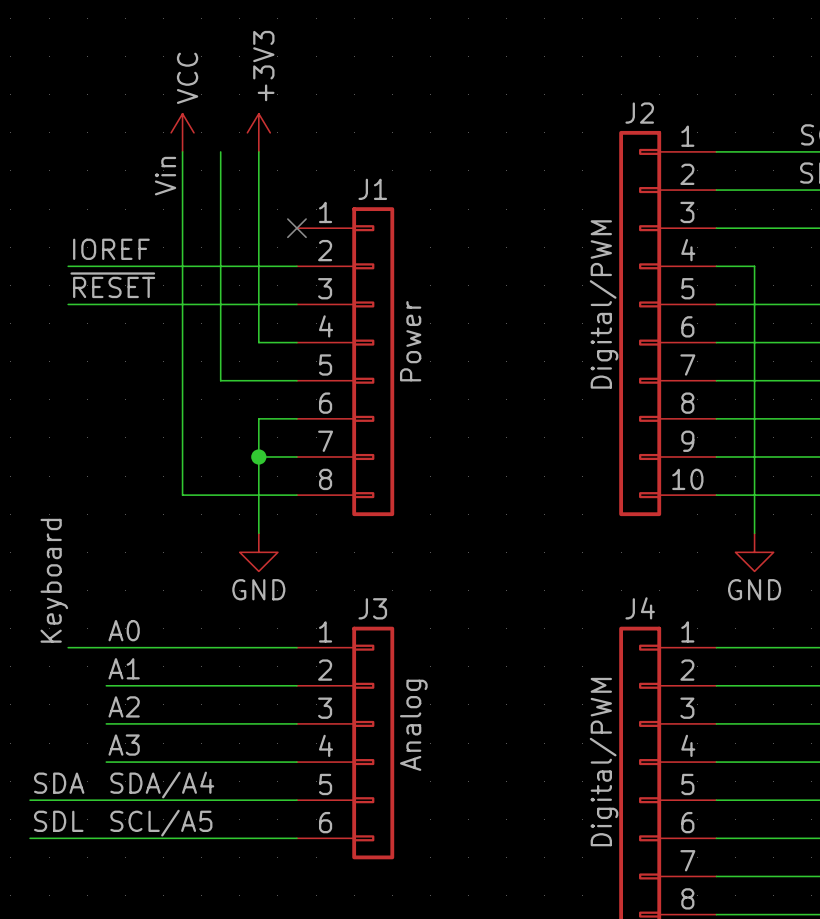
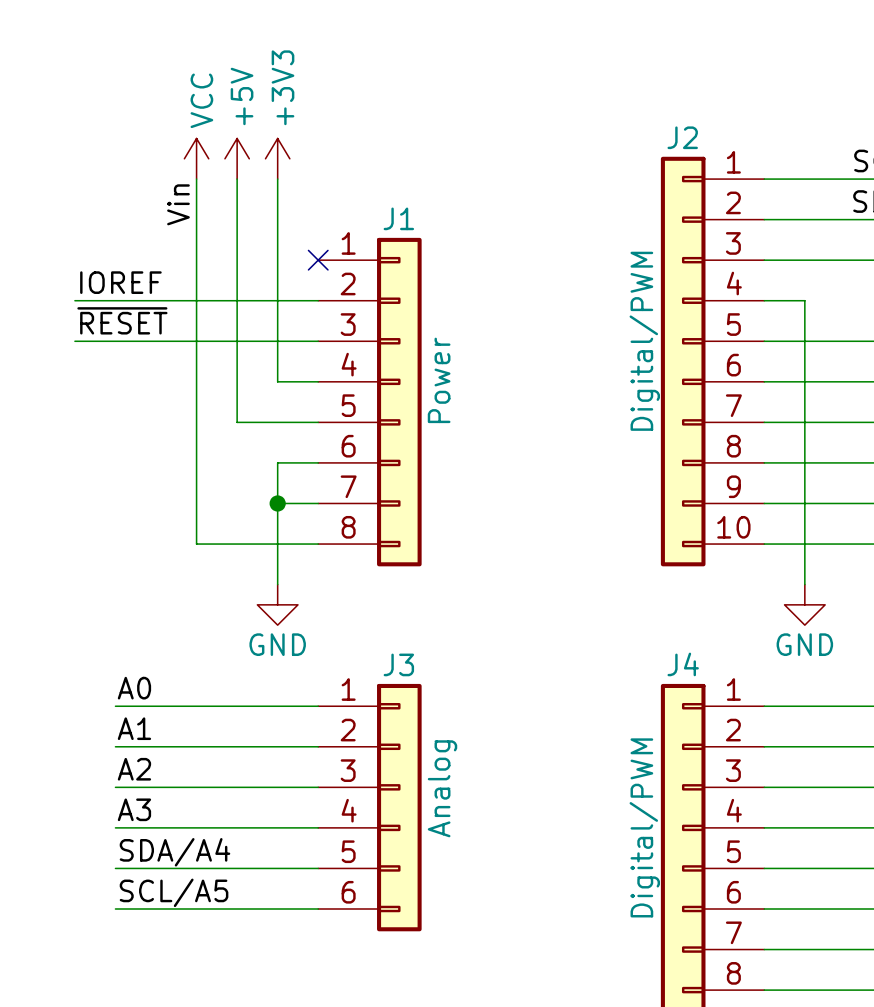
power symbol: none -> +5V (237, 158)
label: Keyboard (54, 580) -> none
wire: (68, 647) (106, 647) -> none
label: SDA (59, 783) -> none
wire: (30, 800) (106, 800) -> none
label: SDL (58, 821) -> none
wire: (30, 838) (106, 838) -> none

